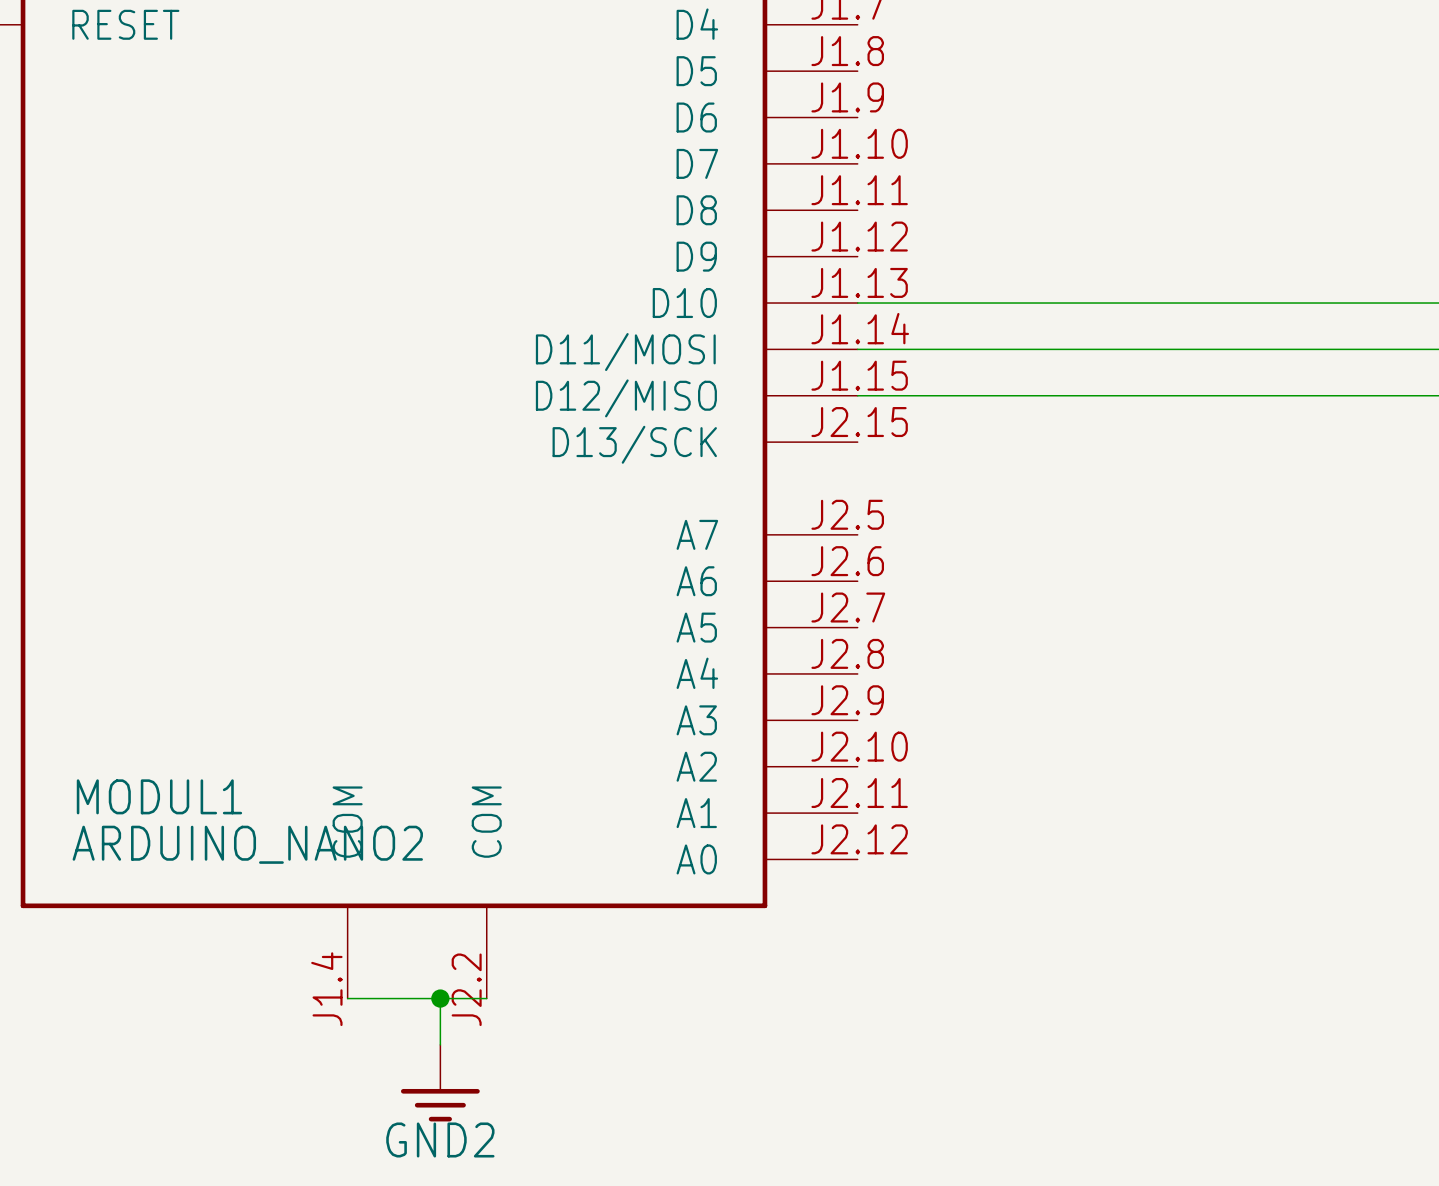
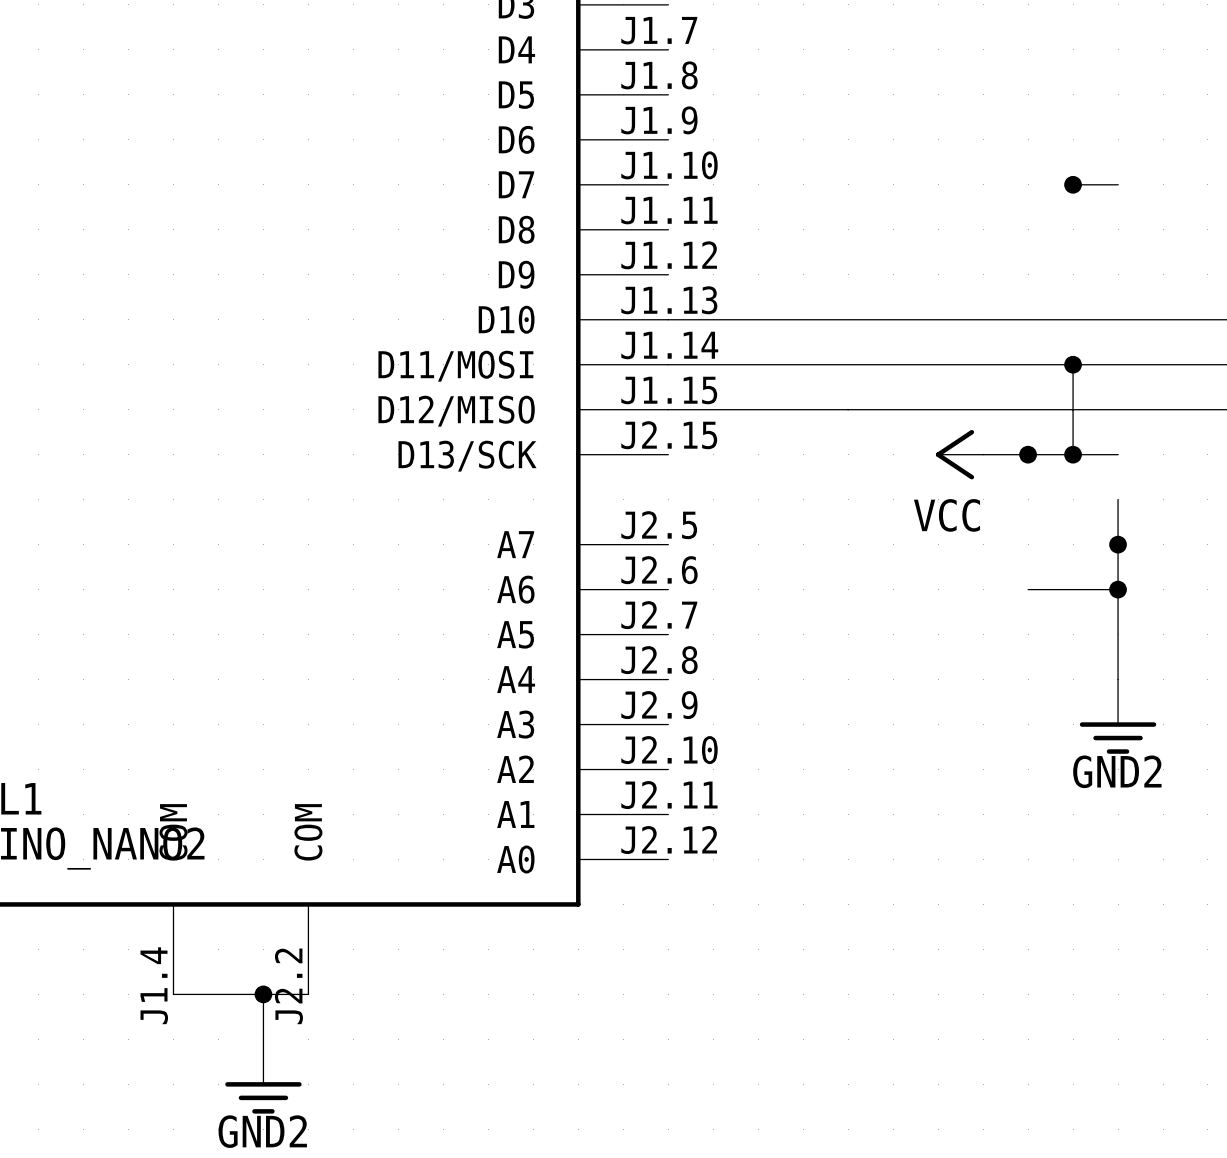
wire: none -> (1073, 184) (1118, 184)
junction: none -> (1073, 184)
wire: none -> (1073, 364) (1073, 454)
junction: none -> (1073, 364)
power symbol: none -> VCC (959, 454)
wire: none -> (983, 454) (1118, 454)
junction: none -> (1028, 454)
junction: none -> (1073, 454)
wire: none -> (1118, 499) (1118, 679)
junction: none -> (1118, 544)
wire: none -> (1028, 589) (1118, 589)
junction: none -> (1118, 589)
power symbol: none -> GND2 (1118, 716)

